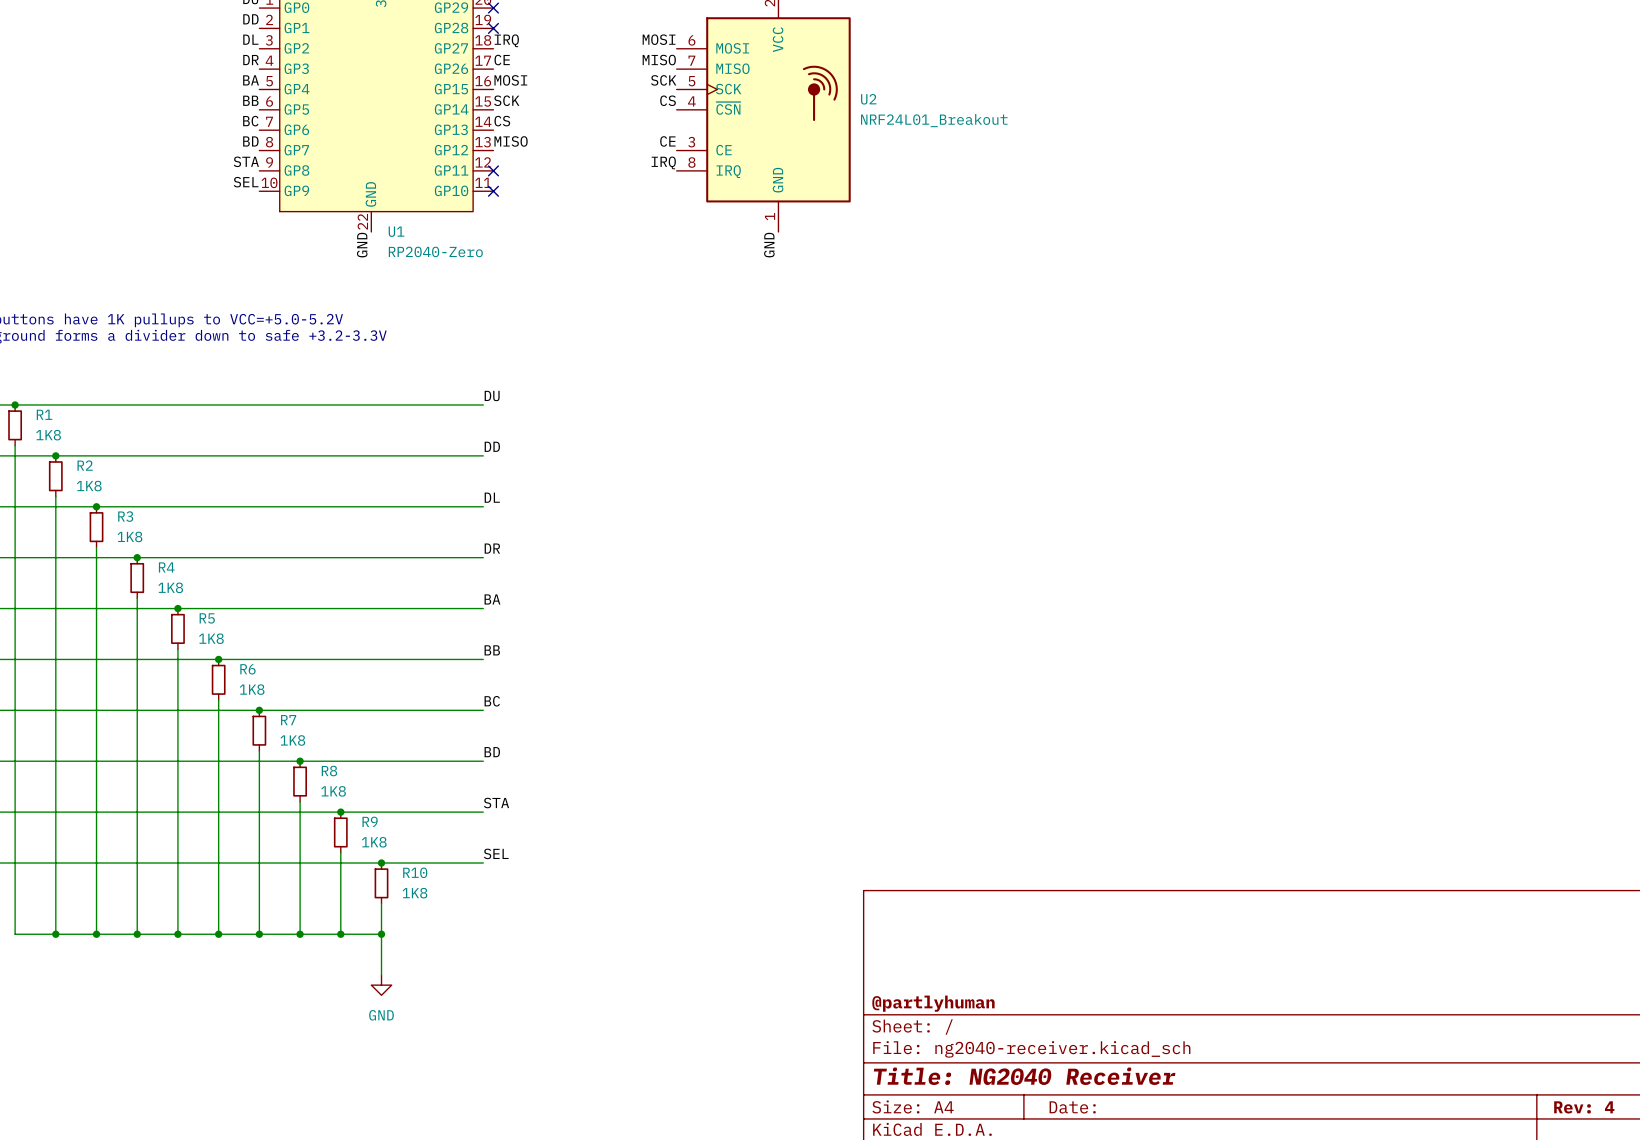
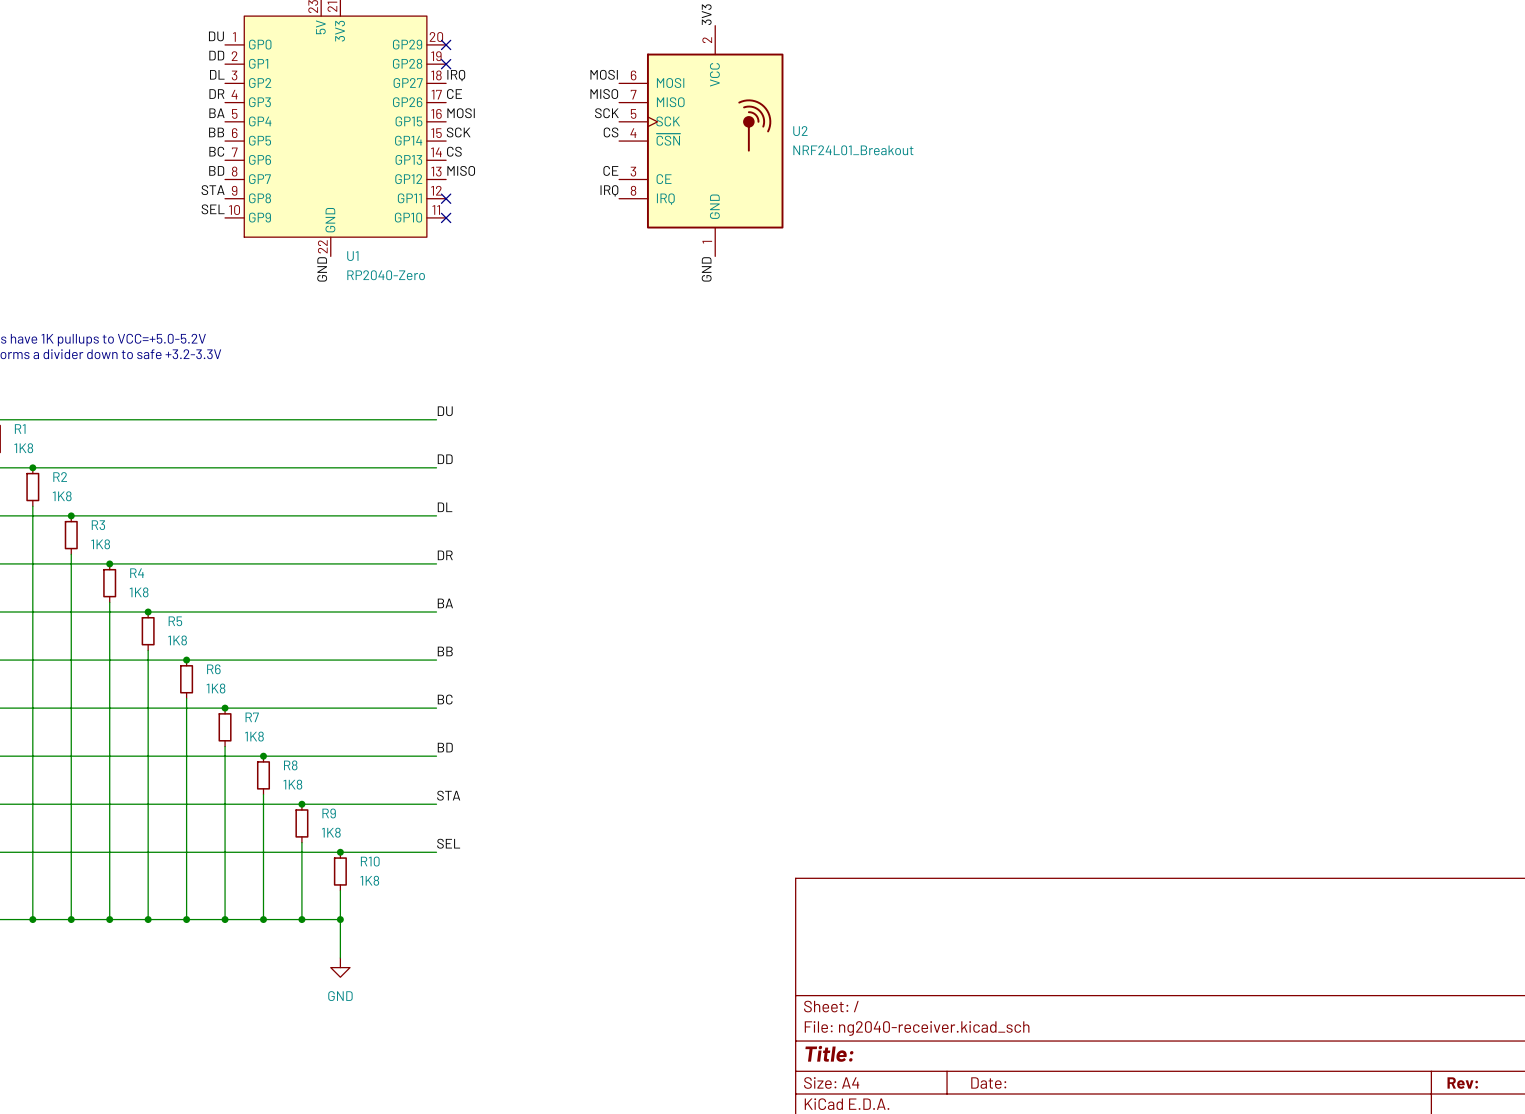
title block: @partlyhuman (933, 1003) -> none
title block: Title: NG2040 Receiver (1024, 1076) -> Title: (829, 1053)
title block: Rev: 4 (1584, 1107) -> Rev: (1462, 1083)

